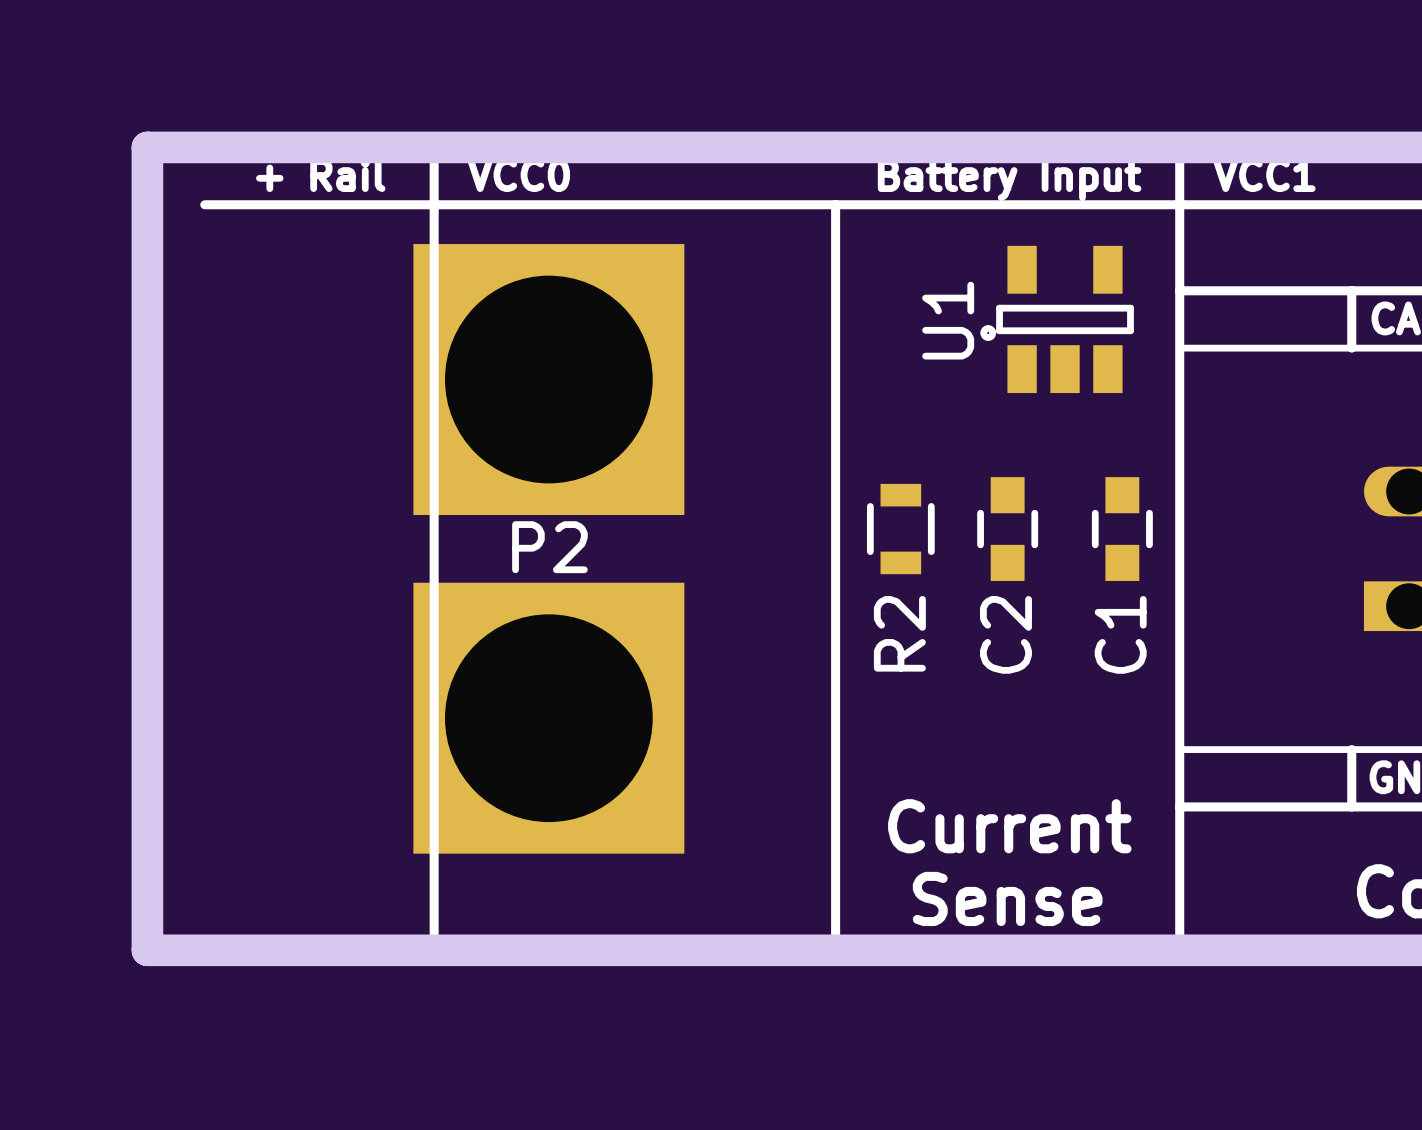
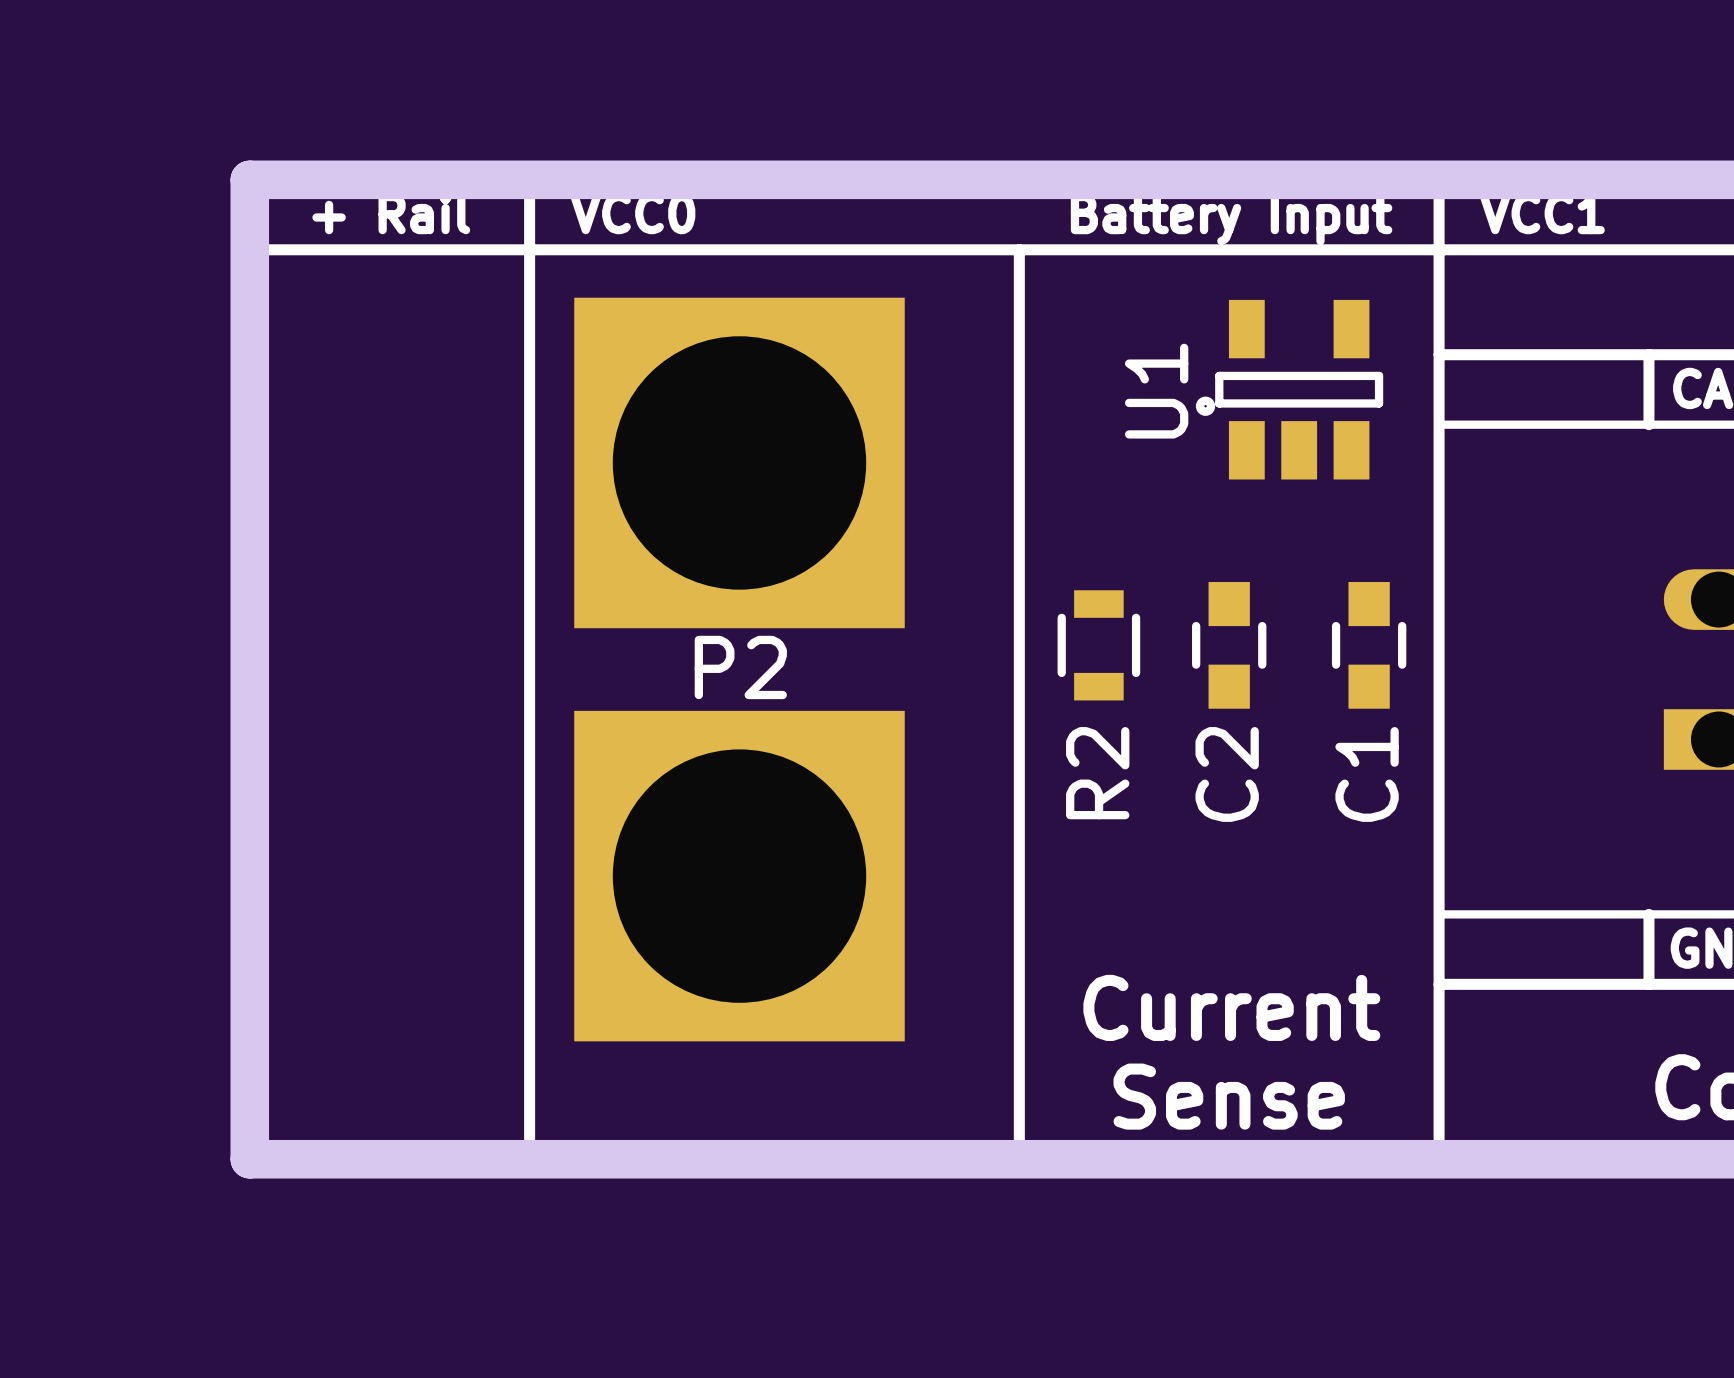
board edge: (204, 147) (147, 147) (147, 950) (204, 950) -> (249, 179) (249, 1159)
P2 position: (548, 548) -> (739, 669)

